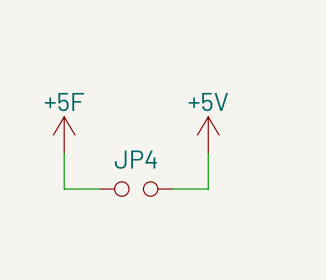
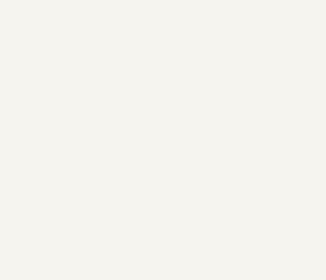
power symbol: +5F (64, 135) -> none
power symbol: +5V (208, 135) -> none
wire: (64, 153) (64, 189) (100, 189) -> none
wire: (208, 153) (208, 189) (172, 189) -> none
JP4: (136, 189) -> none

